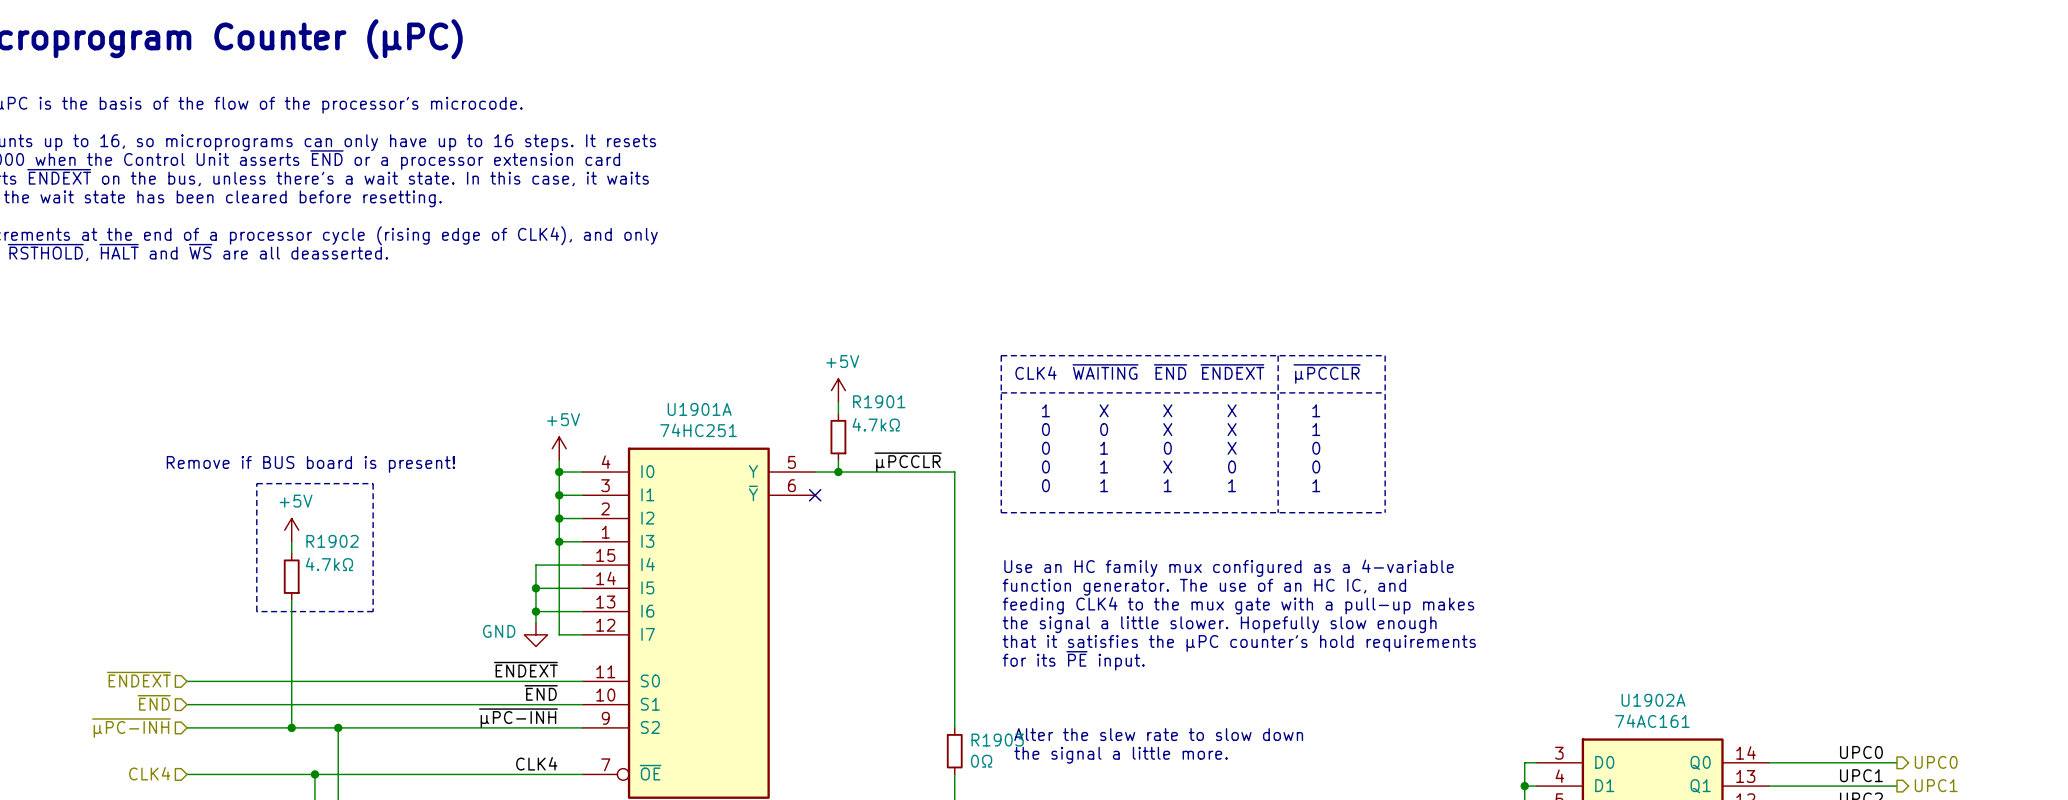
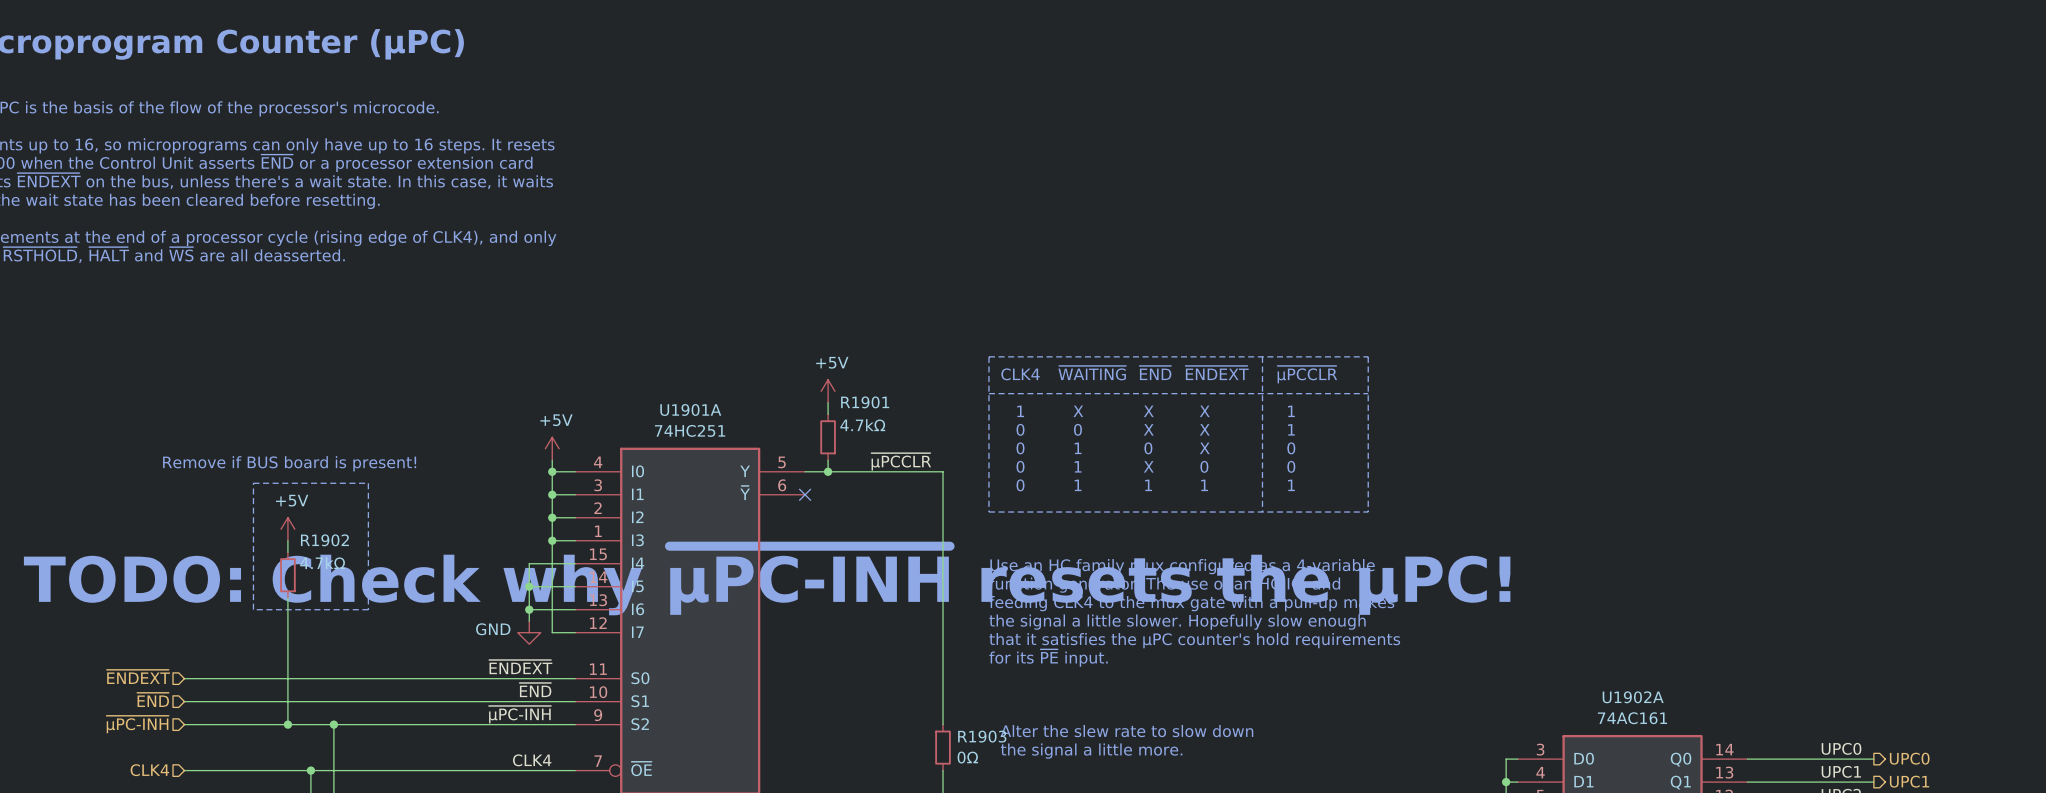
text: none -> TODO: Check why ~{µPC-INH} resets the µPC! (767, 580)

